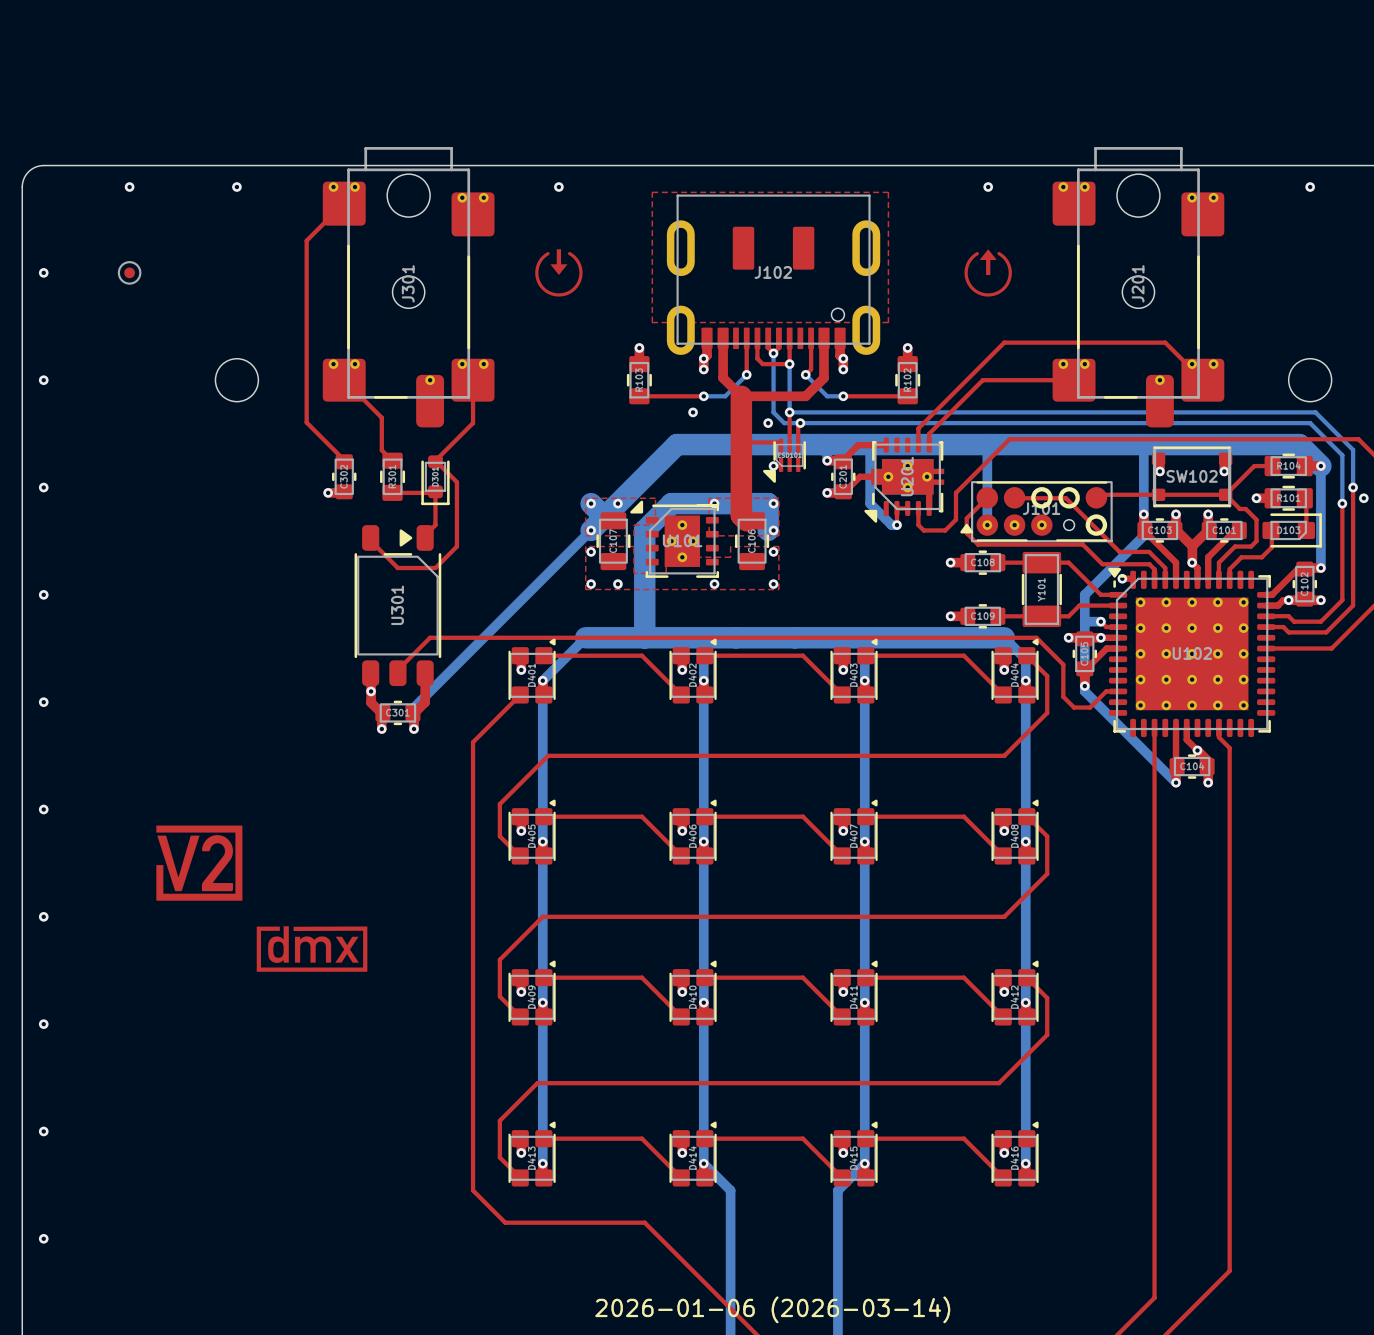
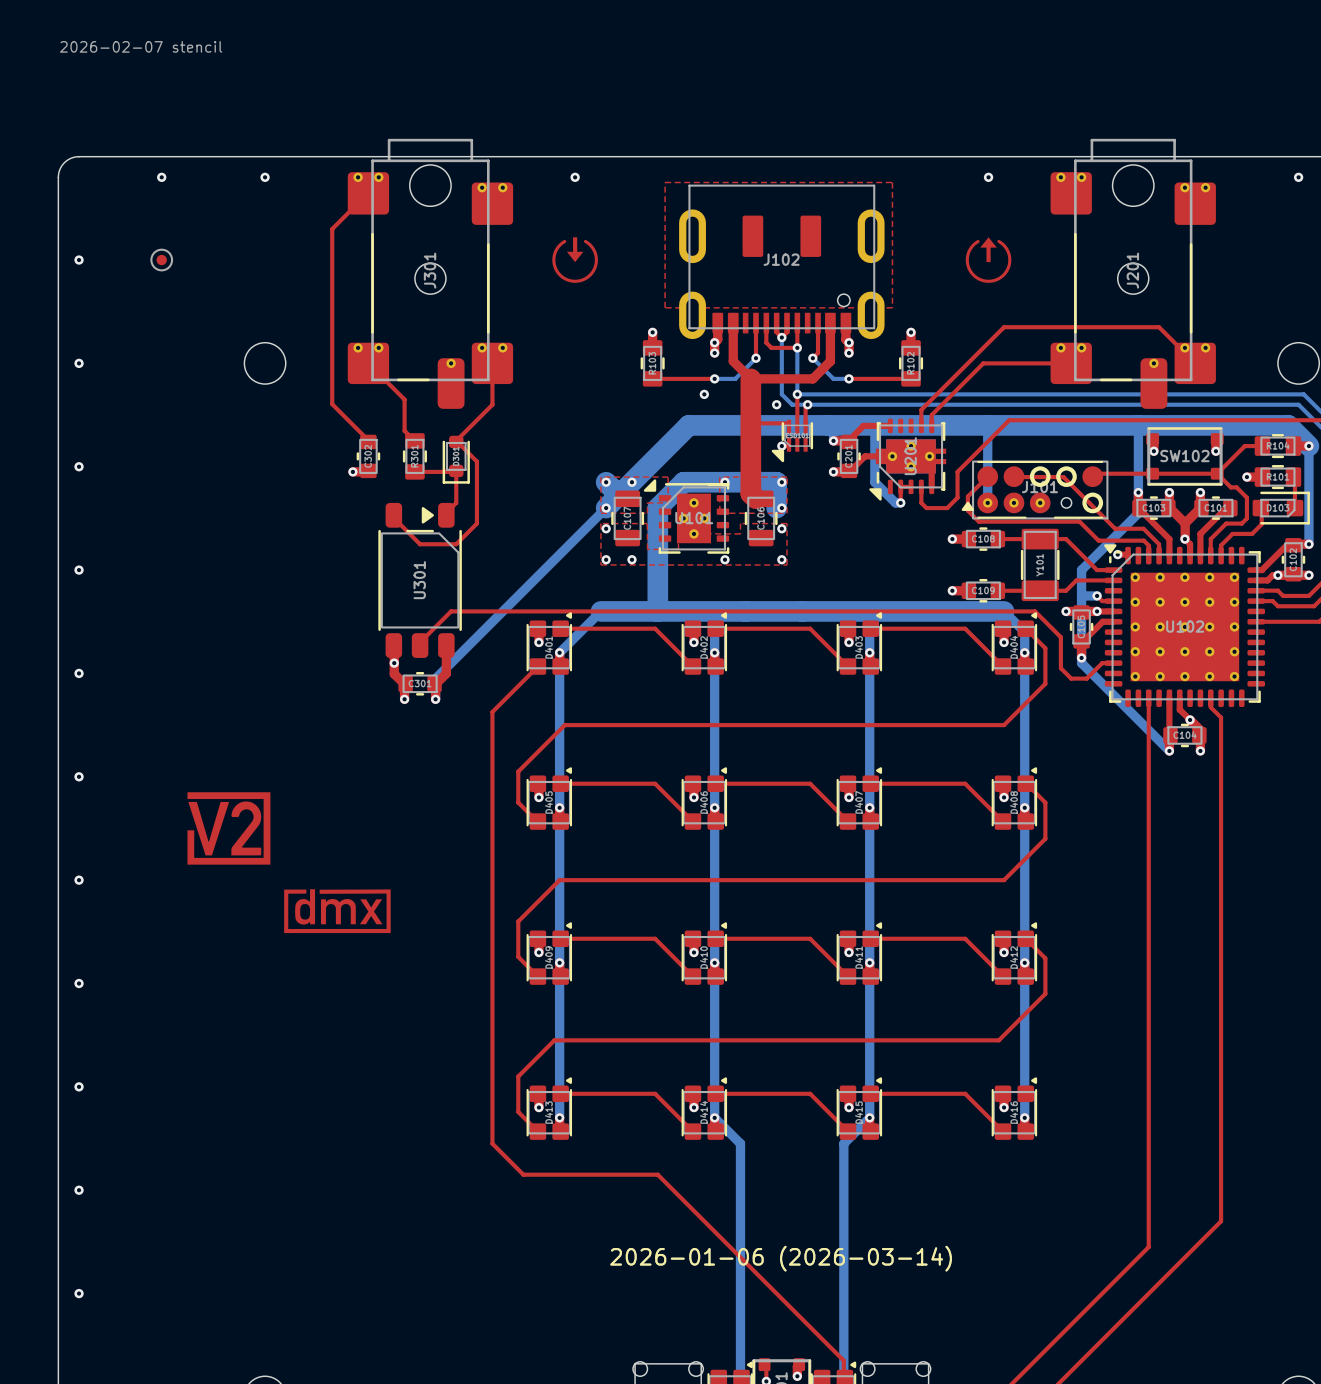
text: none -> 2026-02-07 stencil (141, 46)

